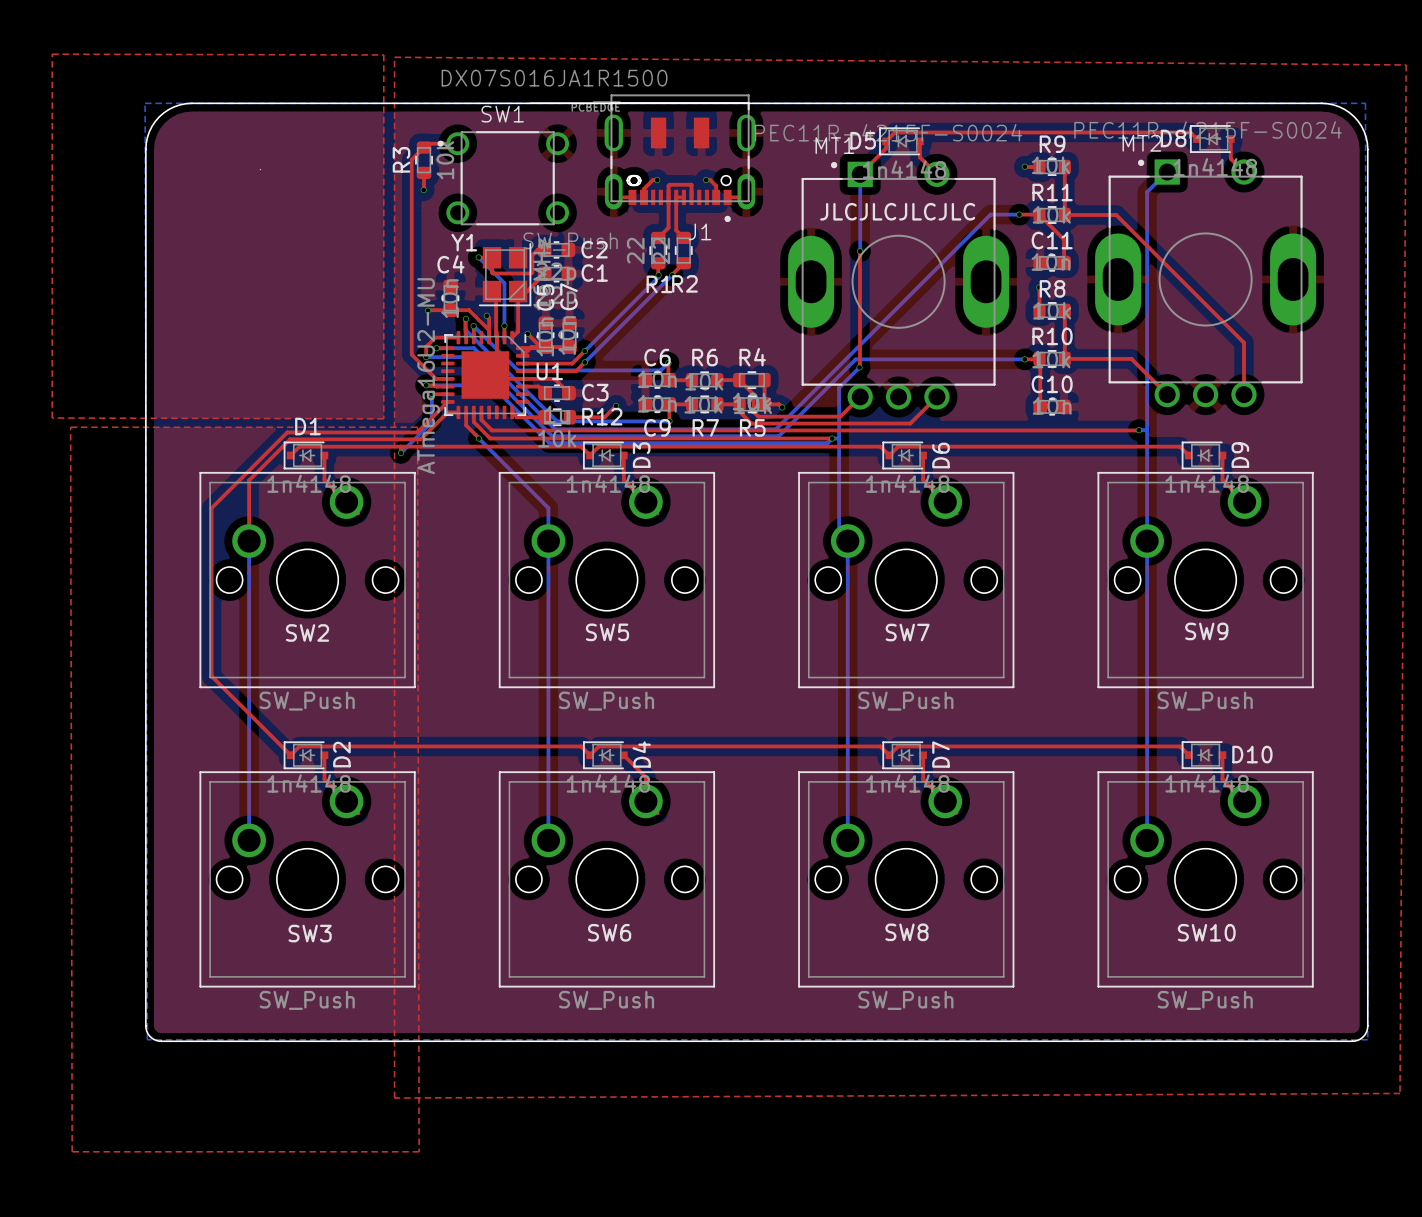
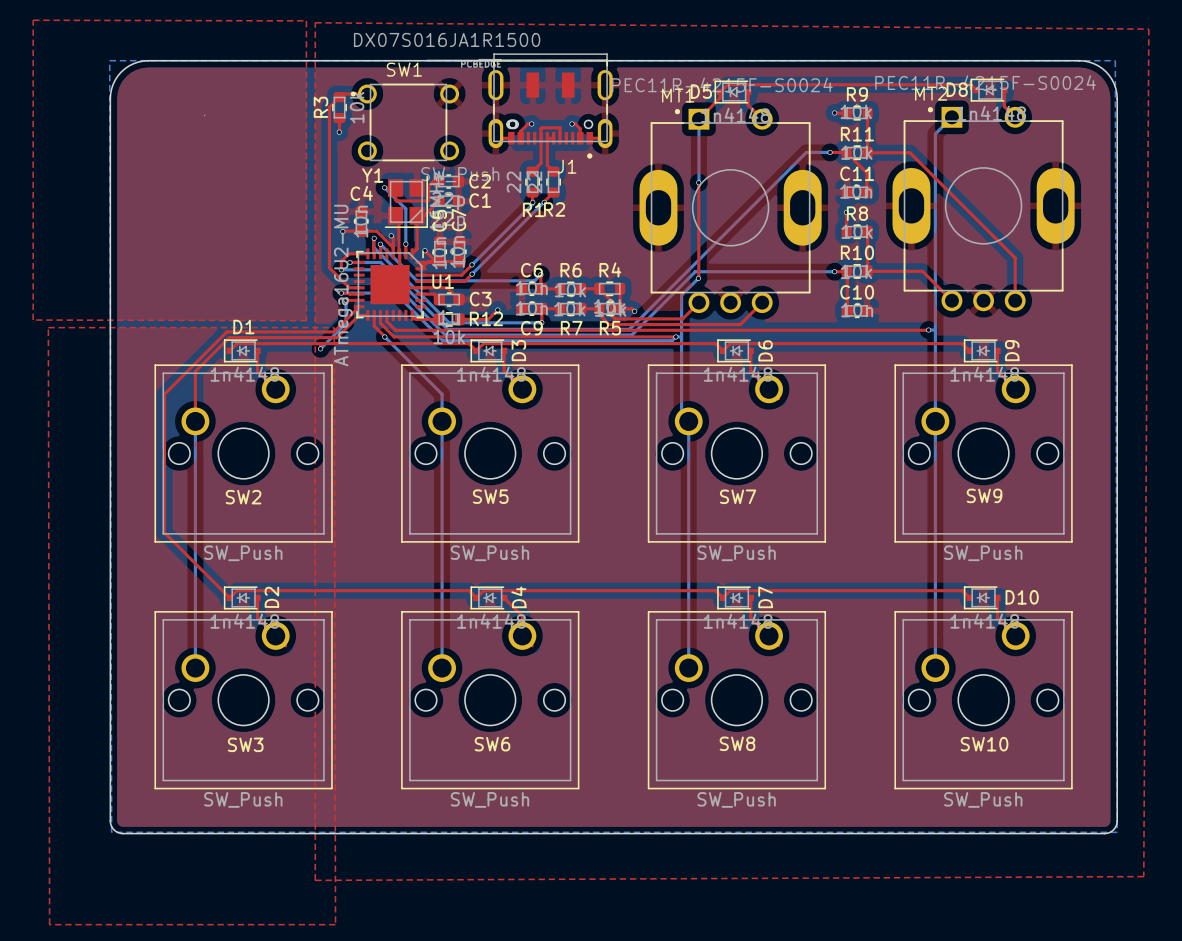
text: JLCJLCJLCJLC (897, 211) -> none

